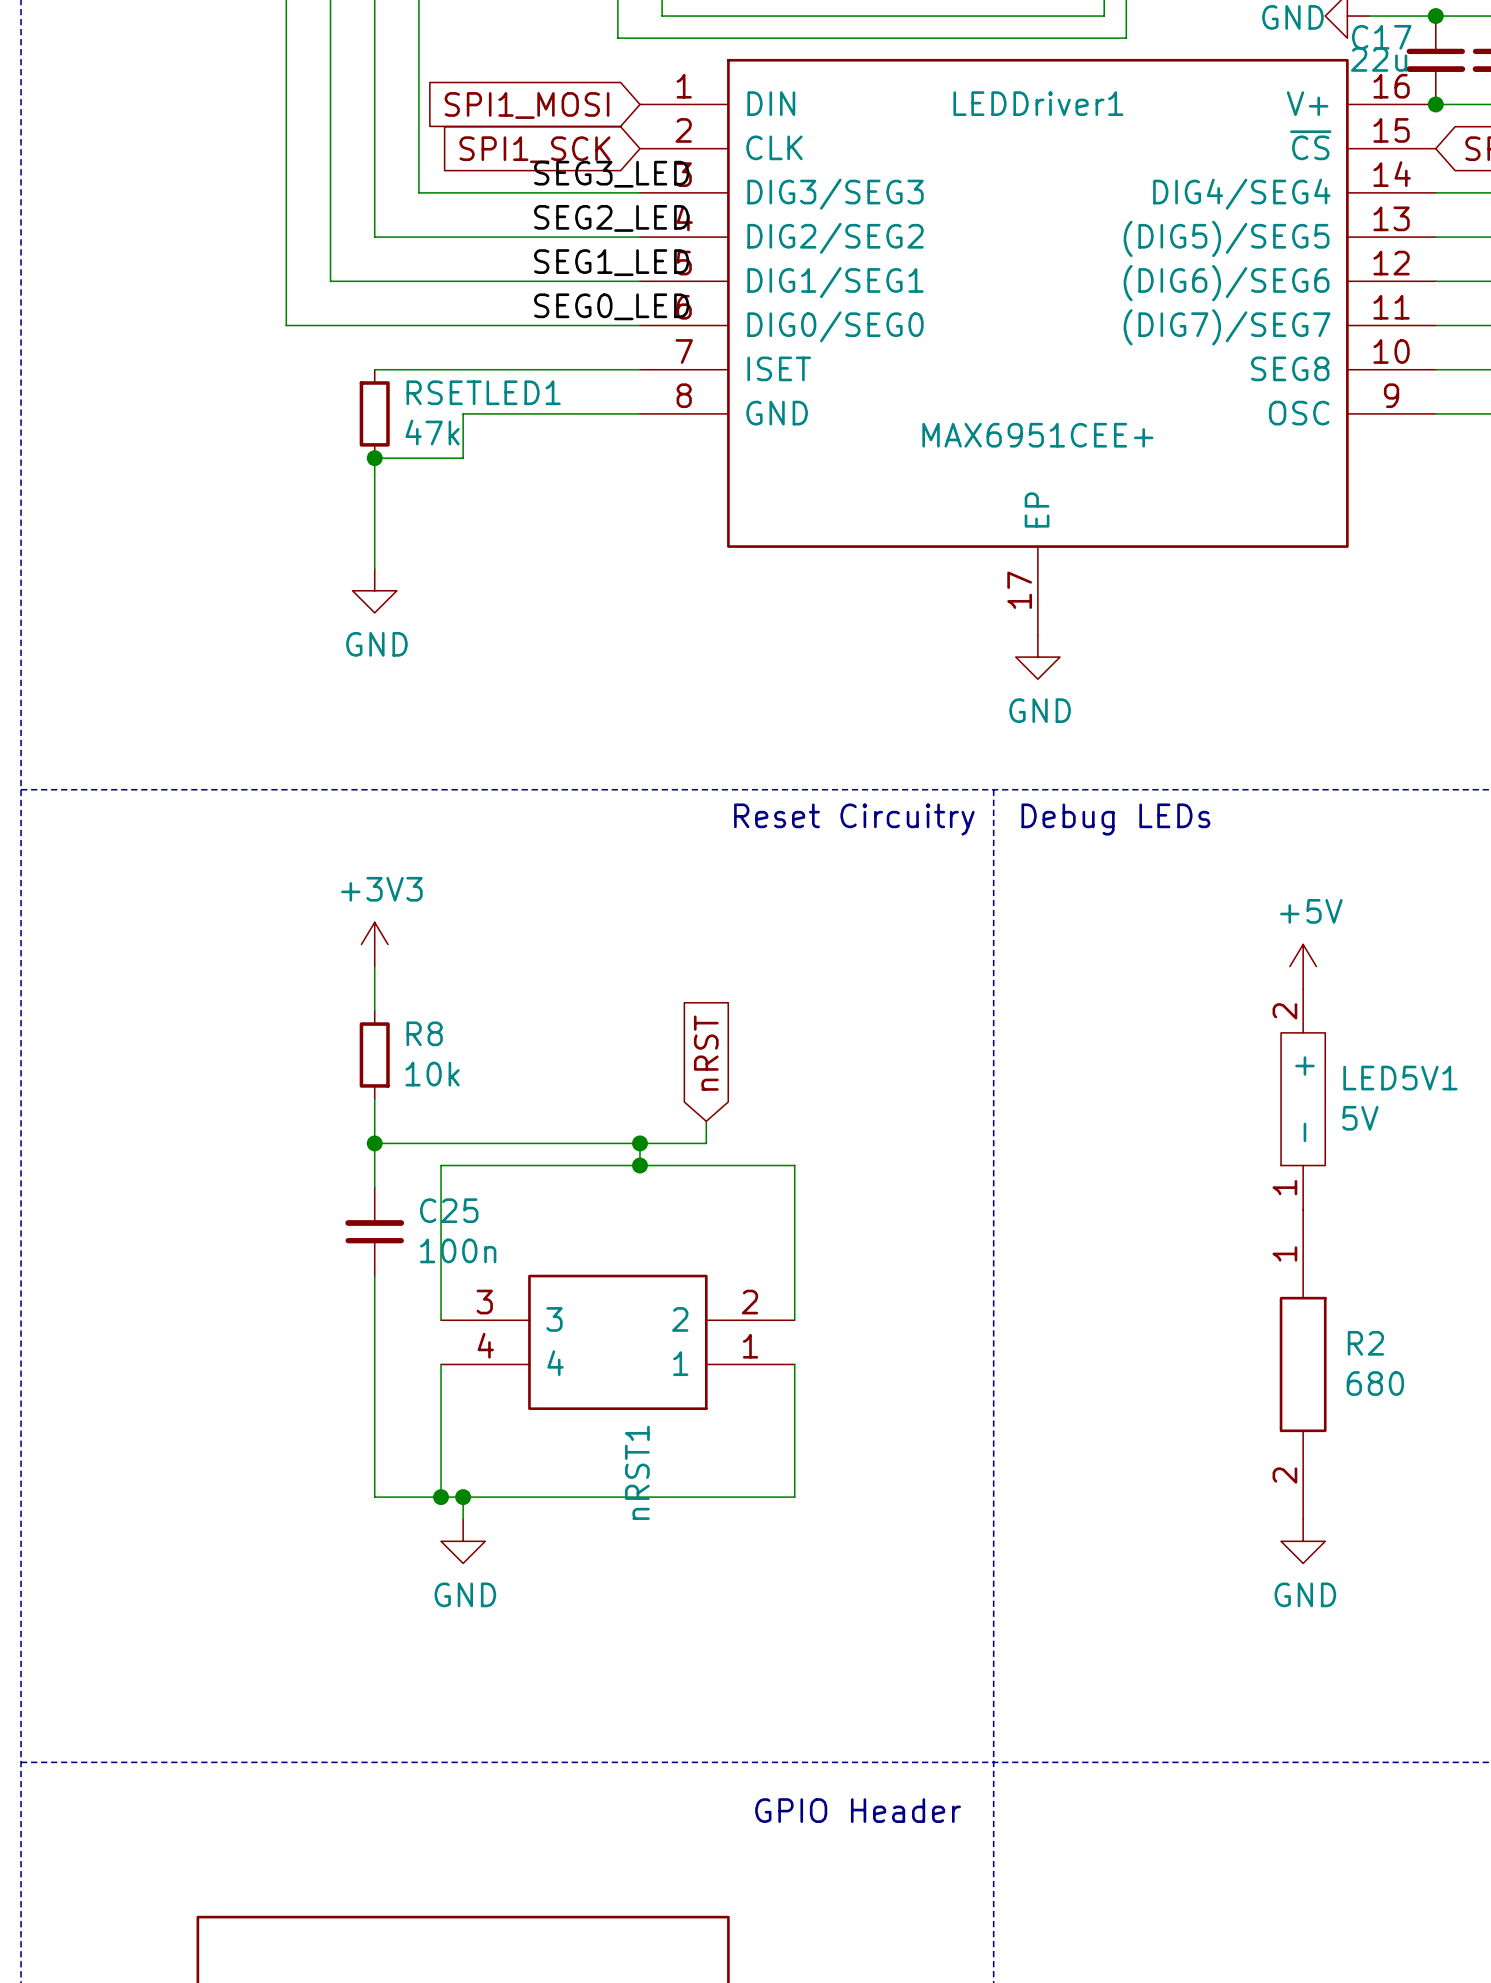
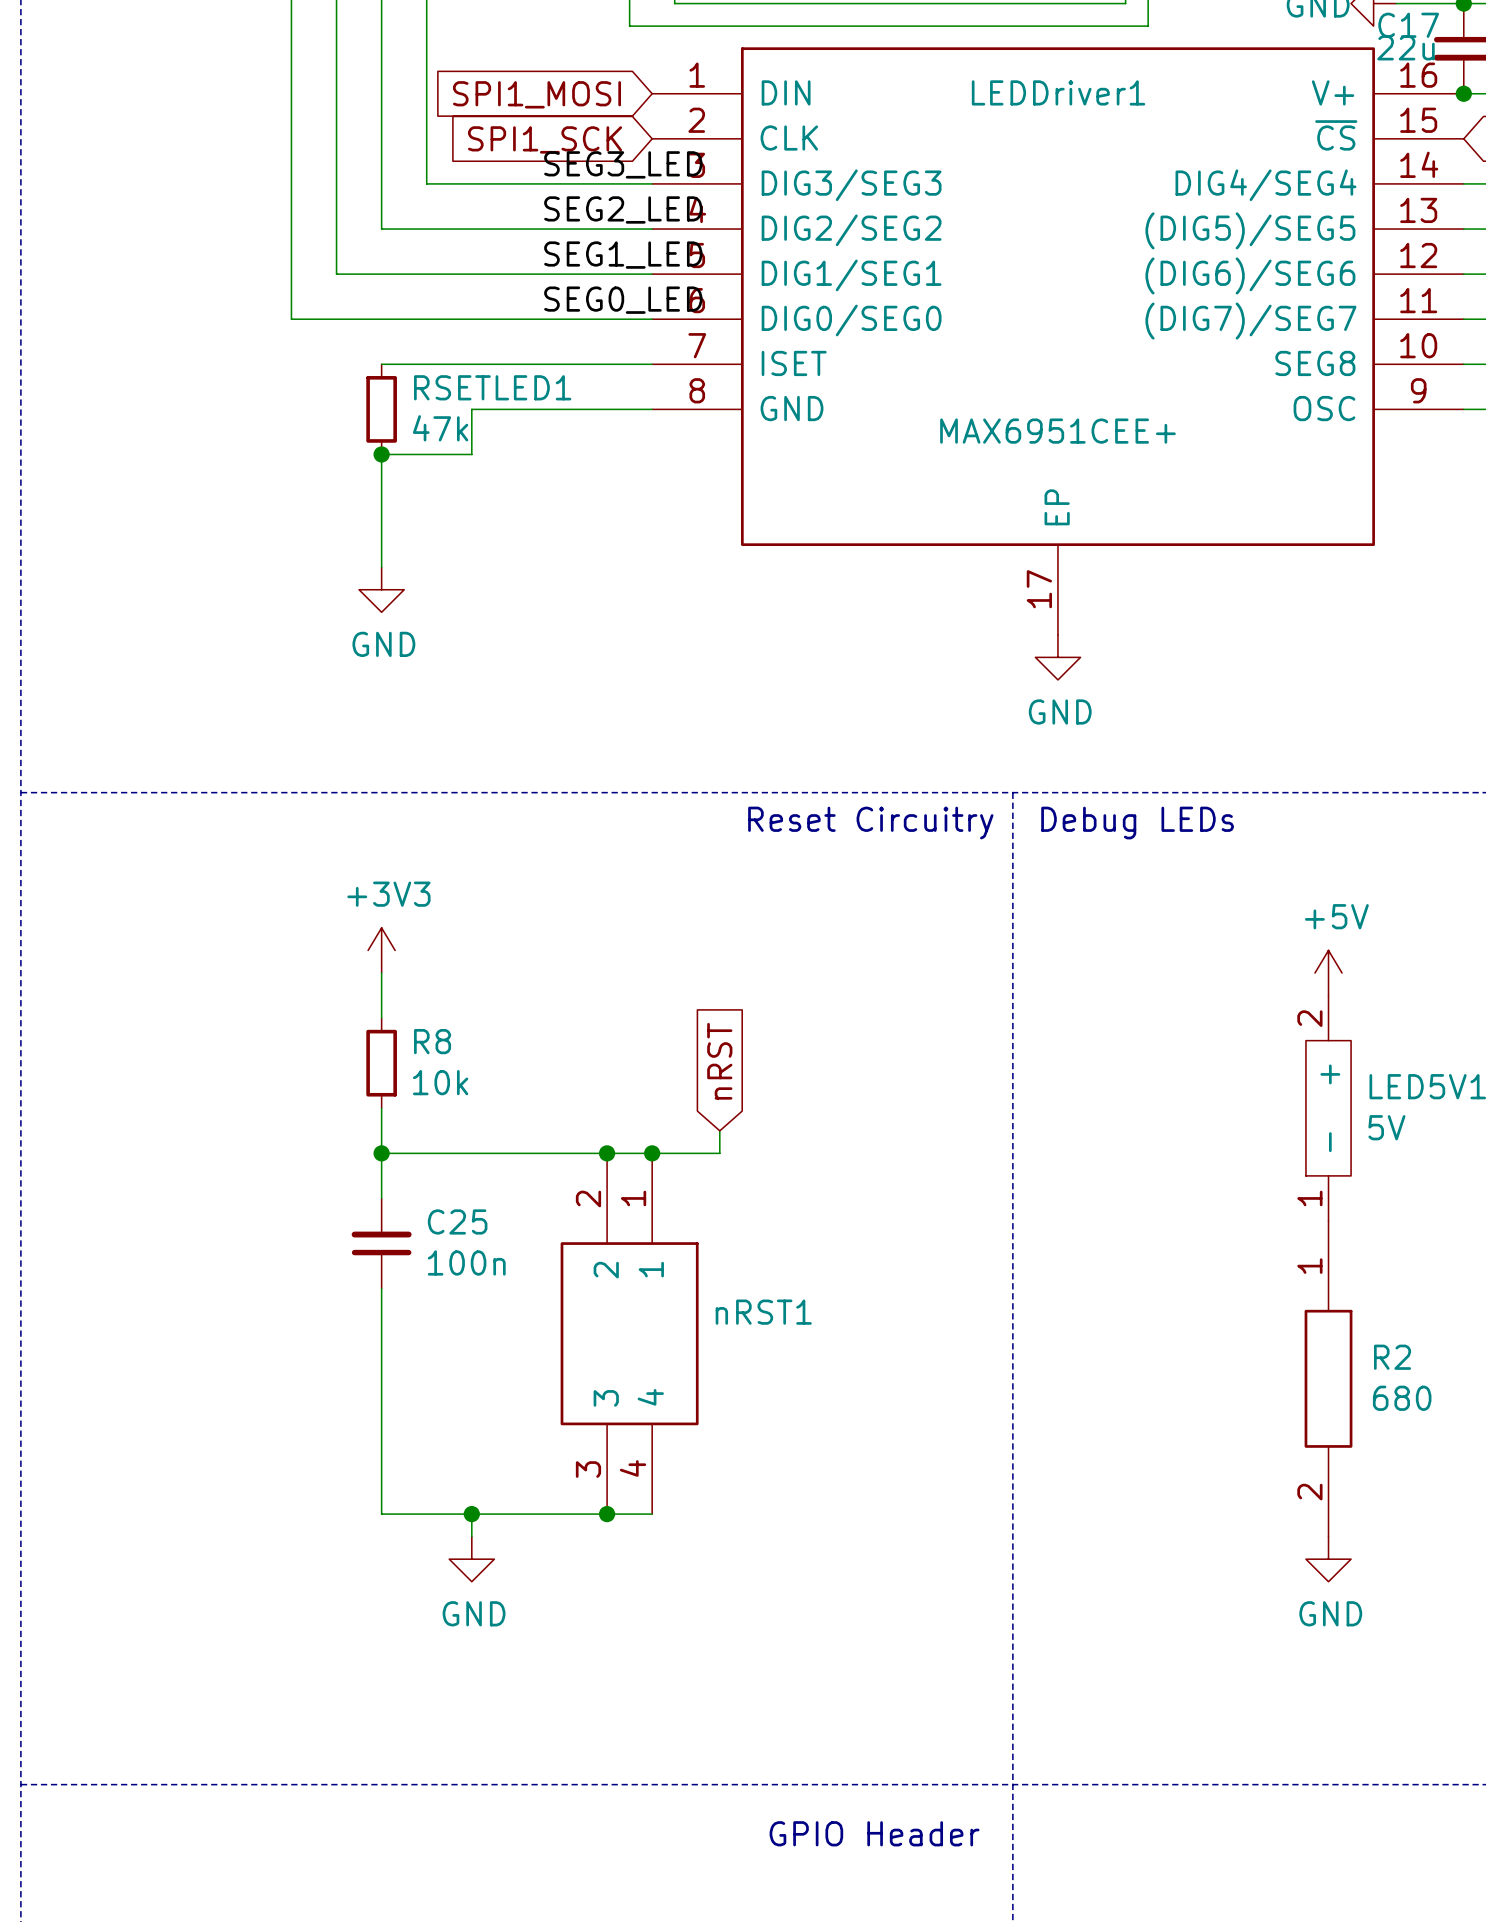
junction position: (639, 1165) -> (607, 1153)
wire: (441, 1320) (441, 1165) (794, 1165) (794, 1320) -> none
nRST1 rotation: 0° (617, 1342) -> 90° counterclockwise (629, 1333)
wire: (441, 1364) (441, 1497) -> none
wire: (794, 1364) (794, 1497) (639, 1497) -> none
junction: (441, 1497) -> none
junction: none -> (607, 1514)

